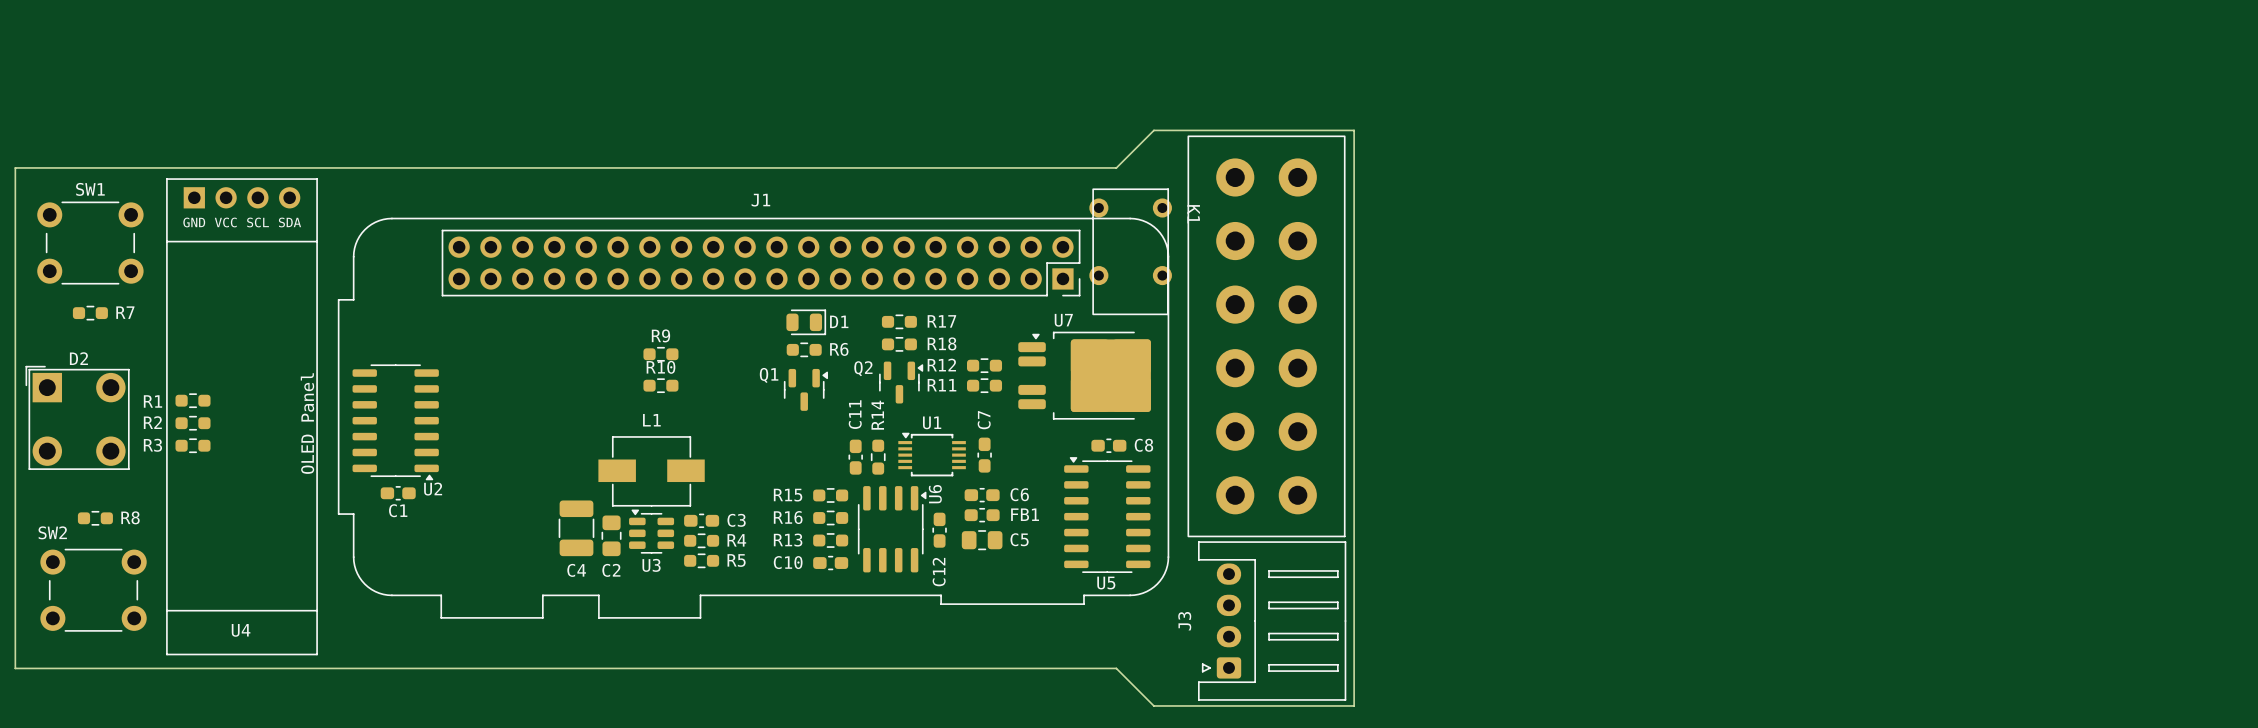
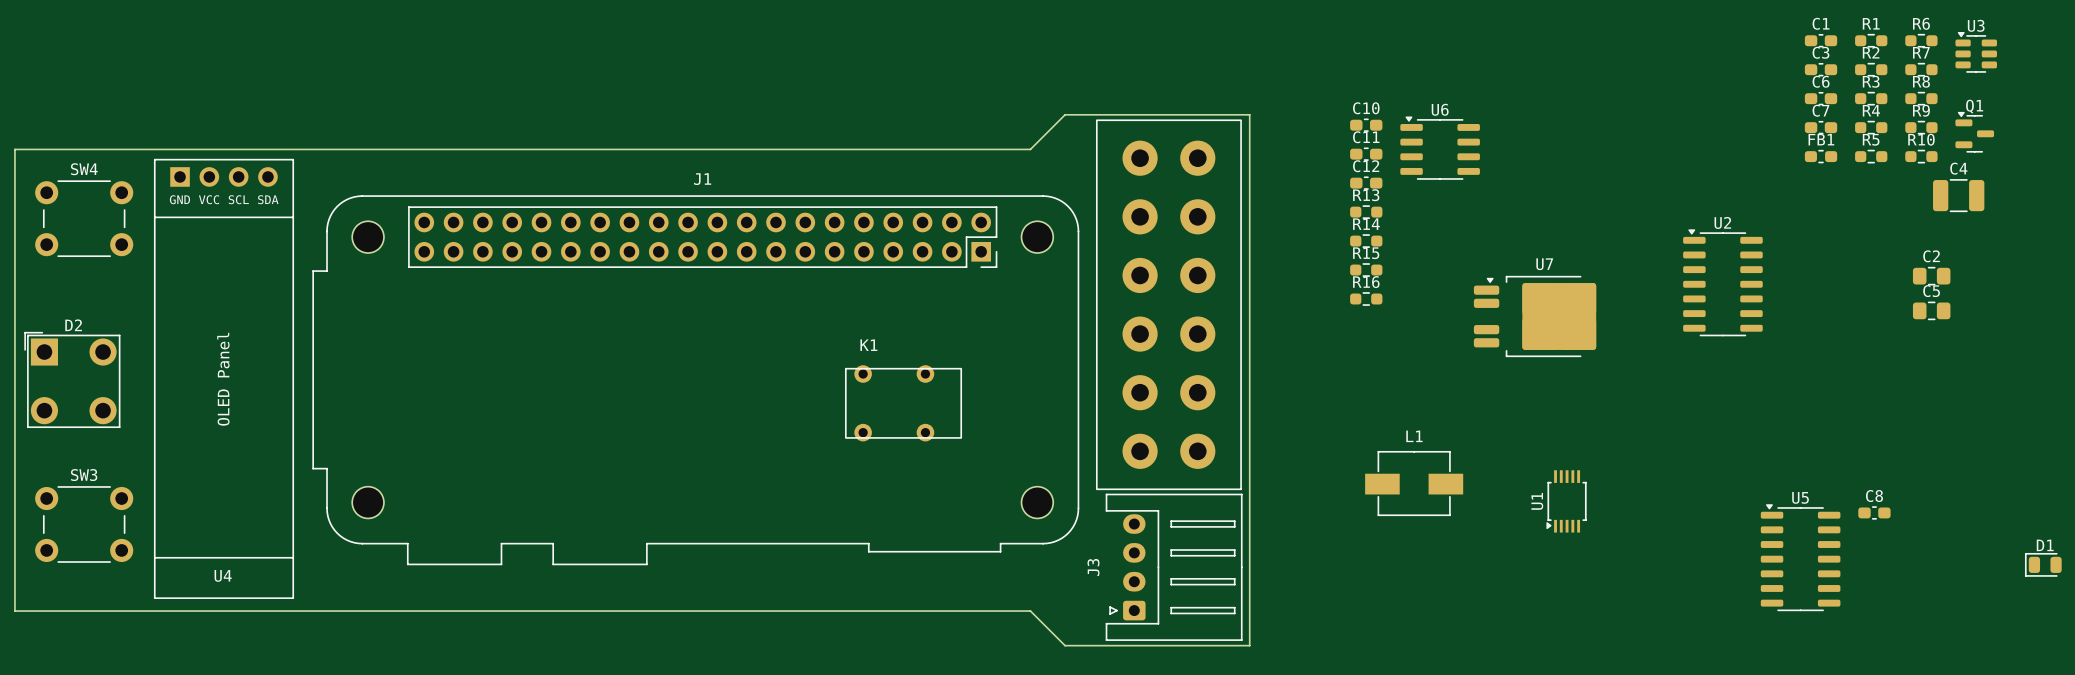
SW1 name: SW1 (90, 189) -> SW4 (84, 169)
J1 footprint: [337, 217, 1170, 619] -> [312, 195, 1080, 566]
K1 rotation: 0° (1130, 251) -> 90° counterclockwise (903, 403)
K1 position: (1130, 251) -> (903, 403)
R7 name position: R7 (125, 312) -> R7 (1921, 52)
R7 position: (90, 313) -> (1921, 69)
U7 name position: U7 (1063, 320) -> U7 (1544, 264)
D1 name position: D1 (839, 321) -> D1 (2045, 545)
R17: (899, 321) -> none
D1 rotation: 0° (806, 322) -> 180° (2043, 564)
D1 position: (806, 322) -> (2043, 564)
R18: (899, 344) -> none
R6 position: (804, 349) -> (1921, 40)
R6 name position: R6 (839, 349) -> R6 (1921, 23)
R9 position: (660, 354) -> (1921, 127)
R12: (984, 365) -> none
Q1 name position: Q1 (769, 375) -> Q1 (1974, 106)
U7 position: (1084, 375) -> (1535, 316)
Q2: (901, 382) -> none
R10 position: (660, 385) -> (1921, 156)
R11: (984, 385) -> none
Q1 rotation: 0° (805, 389) -> 90° counterclockwise (1974, 132)
Q1 position: (805, 389) -> (1974, 132)
R1 position: (193, 400) -> (1871, 40)
R1 name position: R1 (152, 401) -> R1 (1871, 23)
R2 name position: R2 (152, 422) -> R2 (1871, 52)
U2 rotation: 0° (395, 422) -> 180° (1722, 282)
U2 position: (395, 422) -> (1722, 282)
R2 position: (193, 423) -> (1871, 69)
U4 text position: OLED Panel (307, 423) -> OLED Panel (223, 379)
R3 name position: R3 (152, 445) -> R3 (1871, 81)
R3 position: (193, 445) -> (1871, 98)
C8 position: (1108, 445) -> (1874, 512)
C8 name position: C8 (1143, 445) -> C8 (1874, 496)
U1 rotation: 0° (932, 454) -> 90° counterclockwise (1566, 501)
U1 position: (932, 454) -> (1566, 501)
C7 rotation: 0° (984, 455) -> 90° clockwise (1821, 127)
C7 position: (984, 455) -> (1821, 127)
C11 rotation: 0° (855, 457) -> 90° clockwise (1366, 154)
C11 position: (855, 457) -> (1366, 154)
R14 rotation: 0° (878, 457) -> 90° clockwise (1366, 241)
R14 position: (878, 457) -> (1366, 241)
L1 rotation: 0° (651, 471) -> 180° (1414, 483)
L1 position: (651, 471) -> (1414, 483)
U2 name position: U2 (433, 489) -> U2 (1722, 222)
C1 position: (398, 493) -> (1821, 40)
U6 name position: U6 (935, 494) -> U6 (1440, 109)
C6 name position: C6 (1019, 494) -> C6 (1821, 81)
R15 name position: R15 (788, 495) -> R15 (1366, 253)
R15 position: (830, 495) -> (1366, 270)
C6 position: (982, 495) -> (1821, 98)
C1 name position: C1 (398, 510) -> C1 (1821, 23)
FB1 name position: FB1 (1025, 514) -> FB1 (1821, 139)
FB1 position: (982, 515) -> (1821, 156)
U5 position: (1107, 515) -> (1800, 557)
R8 name position: R8 (130, 517) -> R8 (1921, 81)
R16 name position: R16 (788, 517) -> R16 (1366, 282)
R16 position: (830, 517) -> (1366, 299)
R8 position: (95, 518) -> (1921, 98)
C3 position: (701, 520) -> (1821, 69)
C3 name position: C3 (736, 520) -> C3 (1820, 52)
C4 rotation: 0° (576, 528) -> 90° clockwise (1958, 195)
C4 position: (576, 528) -> (1958, 195)
U6 rotation: 0° (892, 529) -> 90° counterclockwise (1440, 148)
U6 position: (892, 529) -> (1440, 148)
C12 rotation: 0° (939, 530) -> 90° clockwise (1366, 183)
C12 position: (939, 530) -> (1366, 183)
U3 position: (651, 531) -> (1976, 52)
C2 rotation: 0° (611, 535) -> 90° clockwise (1931, 276)
C2 position: (611, 535) -> (1931, 276)
C5 name position: C5 (1019, 539) -> C5 (1931, 291)
R4 position: (701, 540) -> (1871, 127)
R4 name position: R4 (736, 540) -> R4 (1871, 110)
R13 name position: R13 (788, 540) -> R13 (1366, 195)
R13 position: (830, 540) -> (1366, 212)
C5 position: (982, 540) -> (1931, 310)
R5 position: (701, 560) -> (1871, 156)
R5 name position: R5 (736, 560) -> R5 (1871, 139)
C10 name position: C10 (788, 562) -> C10 (1366, 108)
C10 position: (830, 563) -> (1366, 125)
U3 name position: U3 (651, 565) -> U3 (1976, 25)
C4 name position: C4 (576, 570) -> C4 (1958, 168)
C2 name position: C2 (611, 570) -> C2 (1931, 256)
C12 name position: C12 (939, 572) -> C12 (1366, 166)
SW3: none -> (84, 524)
U5 name position: U5 (1106, 583) -> U5 (1800, 497)
SW2: (93, 590) -> none

